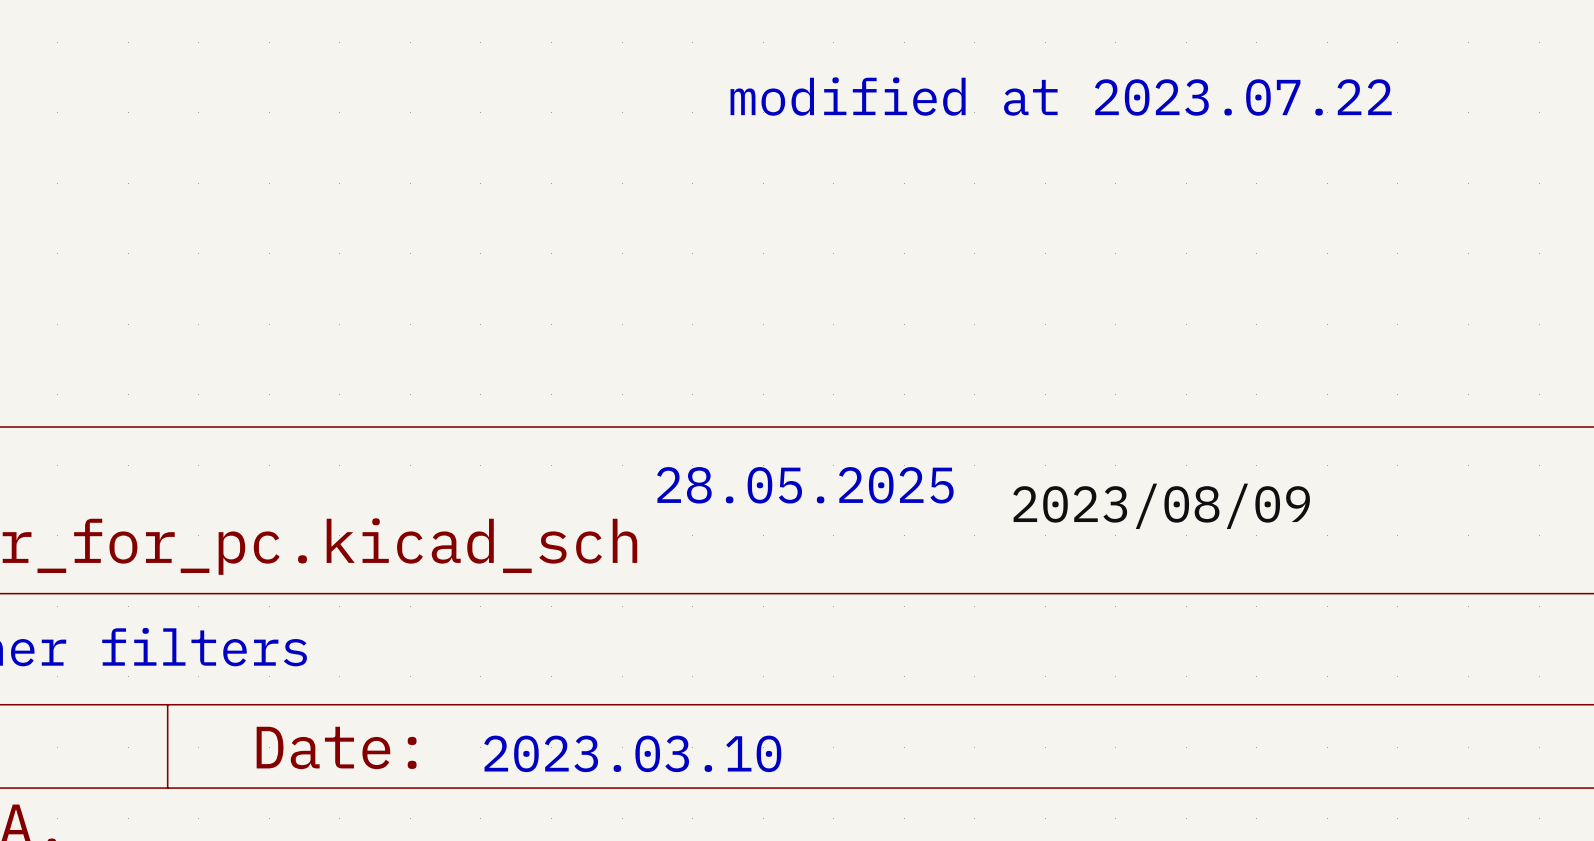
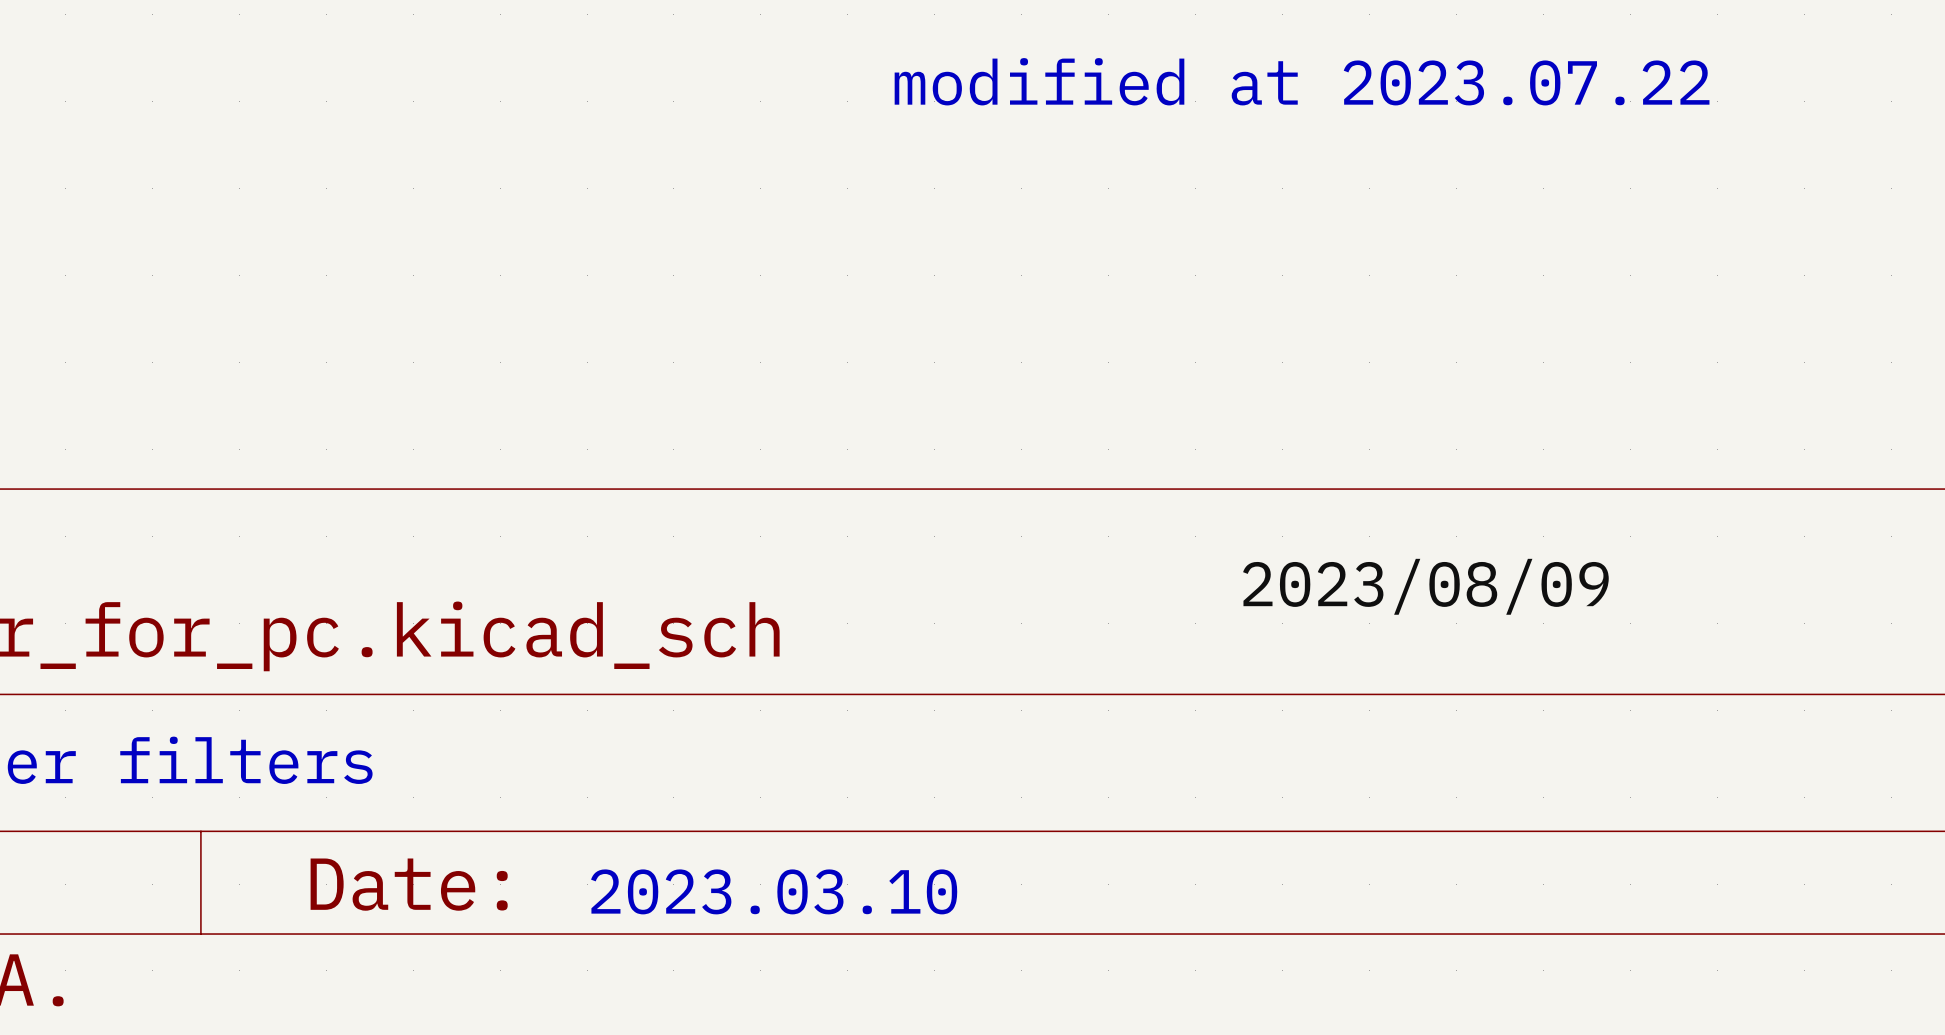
text: 28.05.2025 (805, 485) -> none

